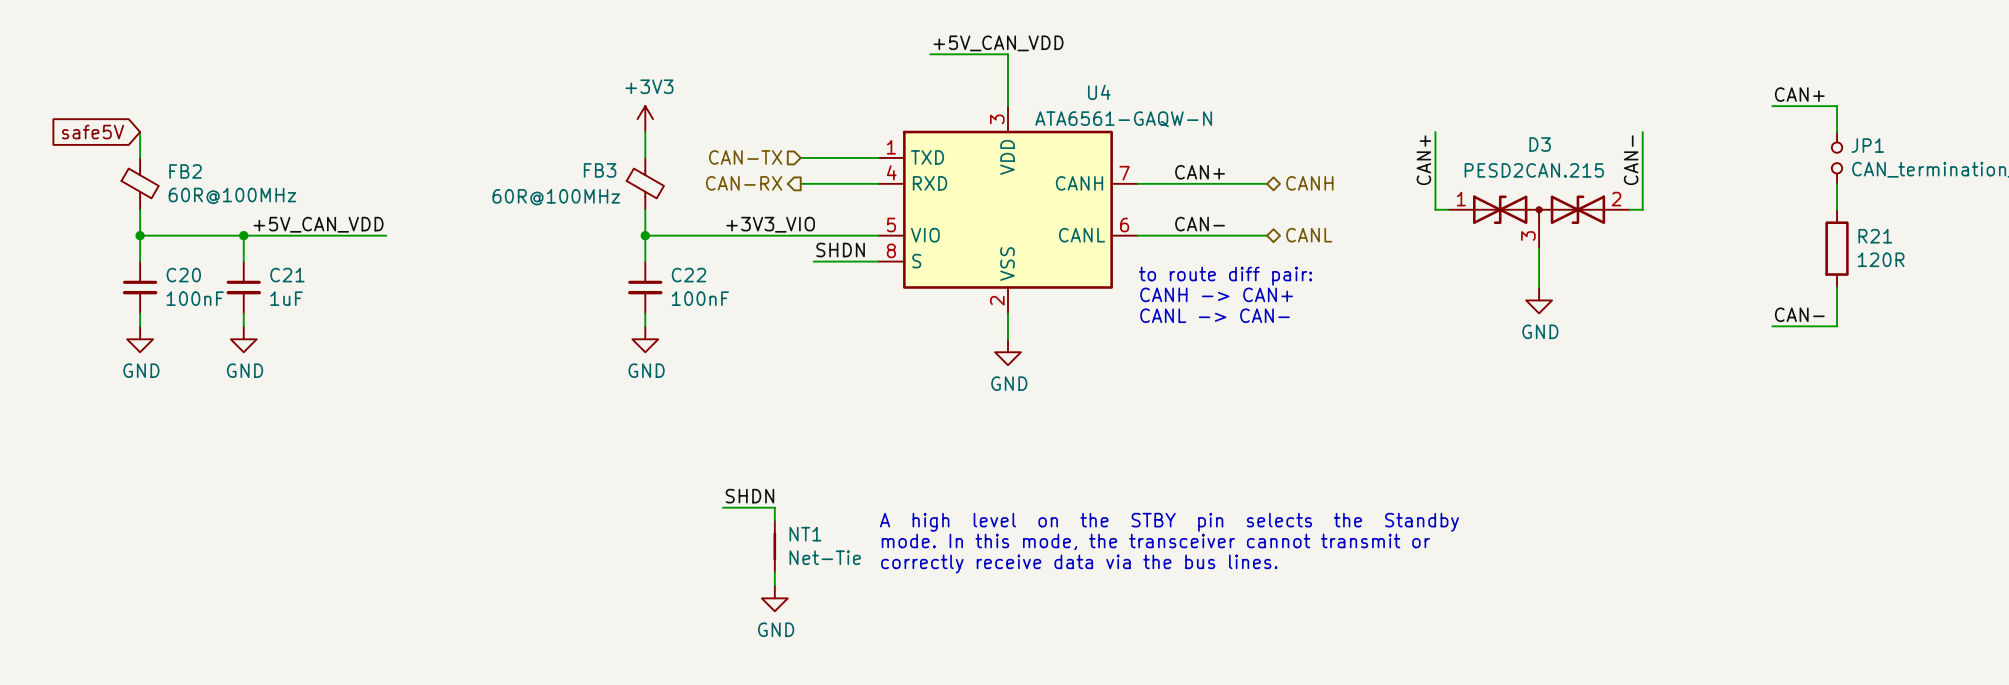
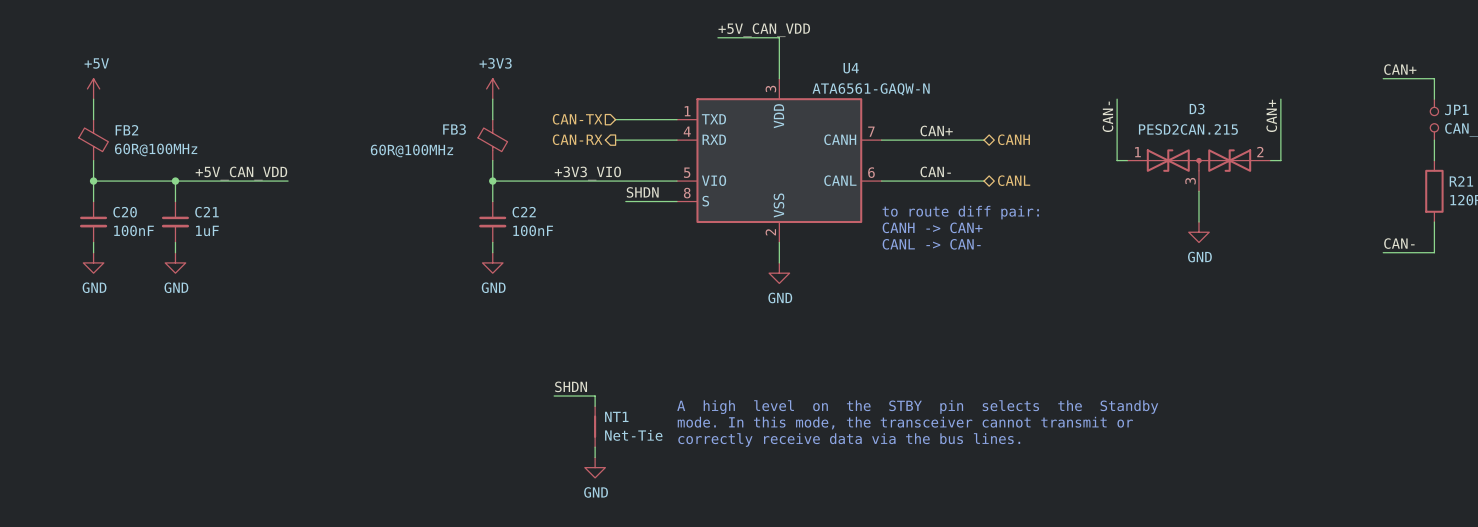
power symbol: none -> +5V (93, 88)
global label: safe5V (93, 132) -> none
label: CAN+ (1423, 160) -> CAN- (1107, 116)
label: CAN- (1631, 160) -> CAN+ (1271, 115)

